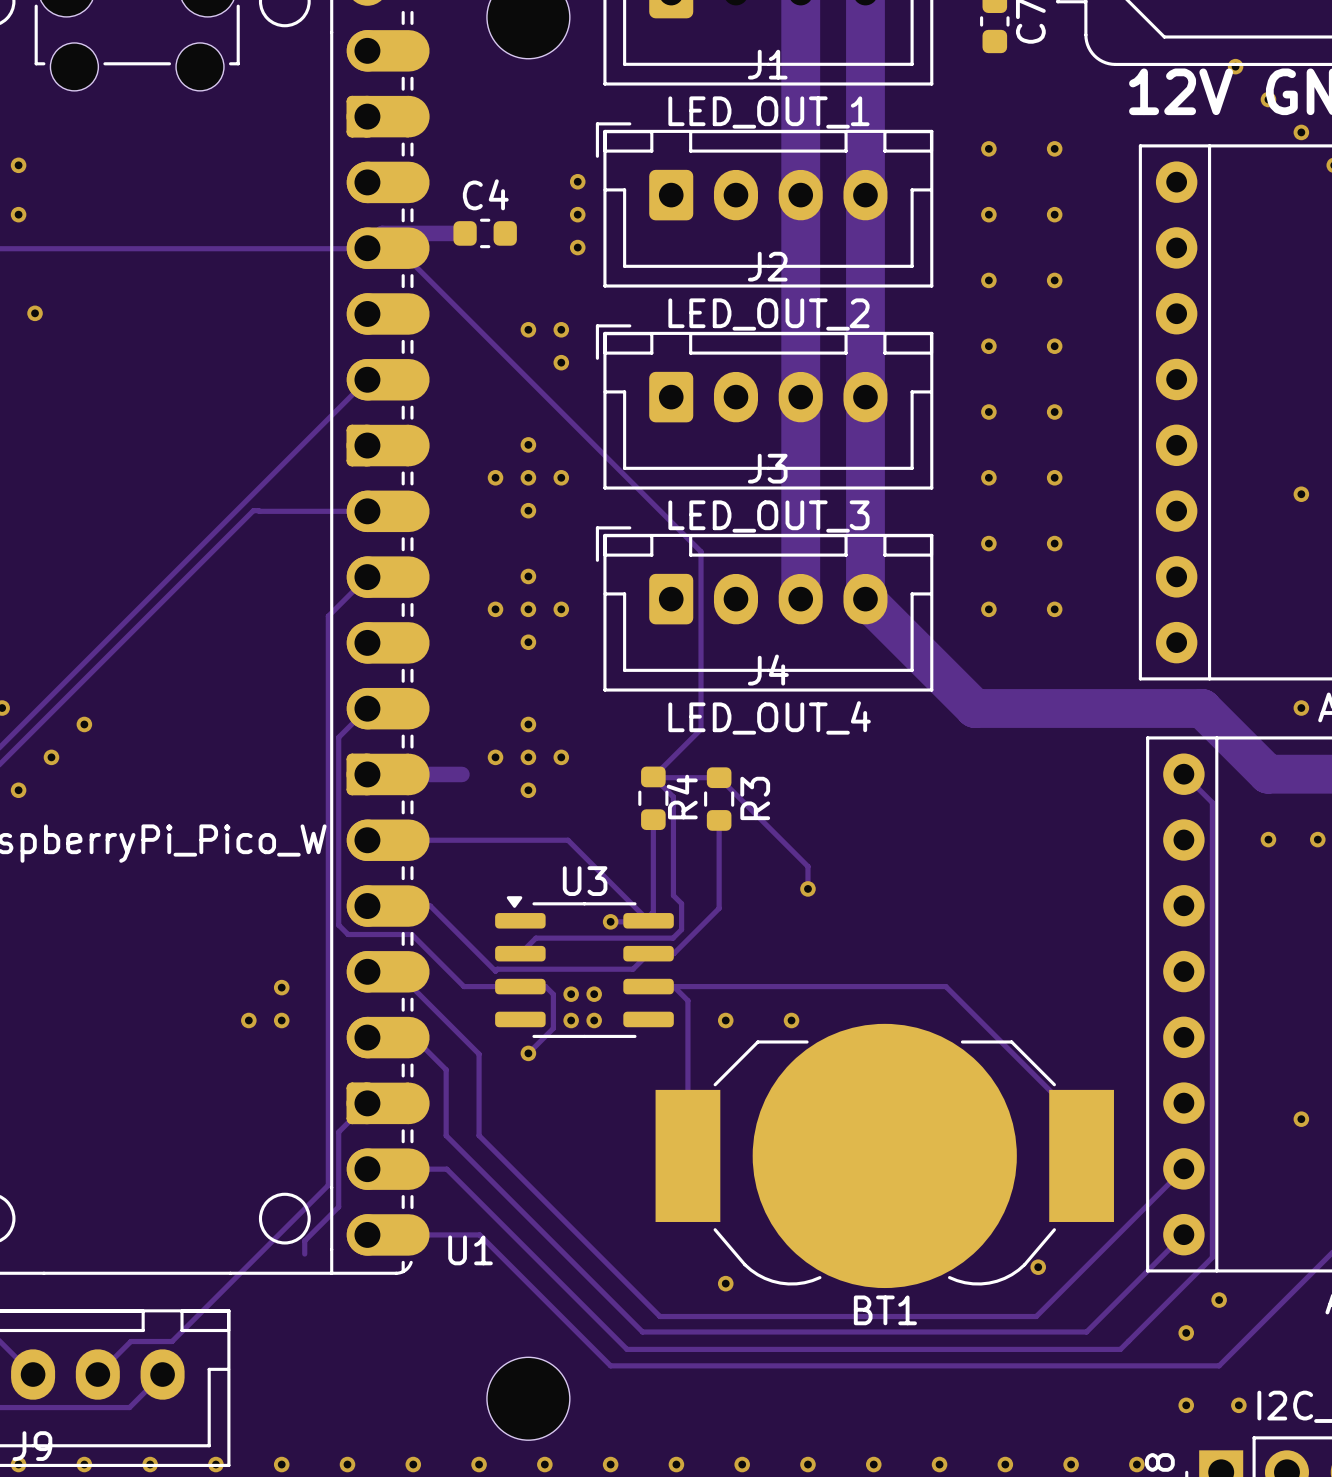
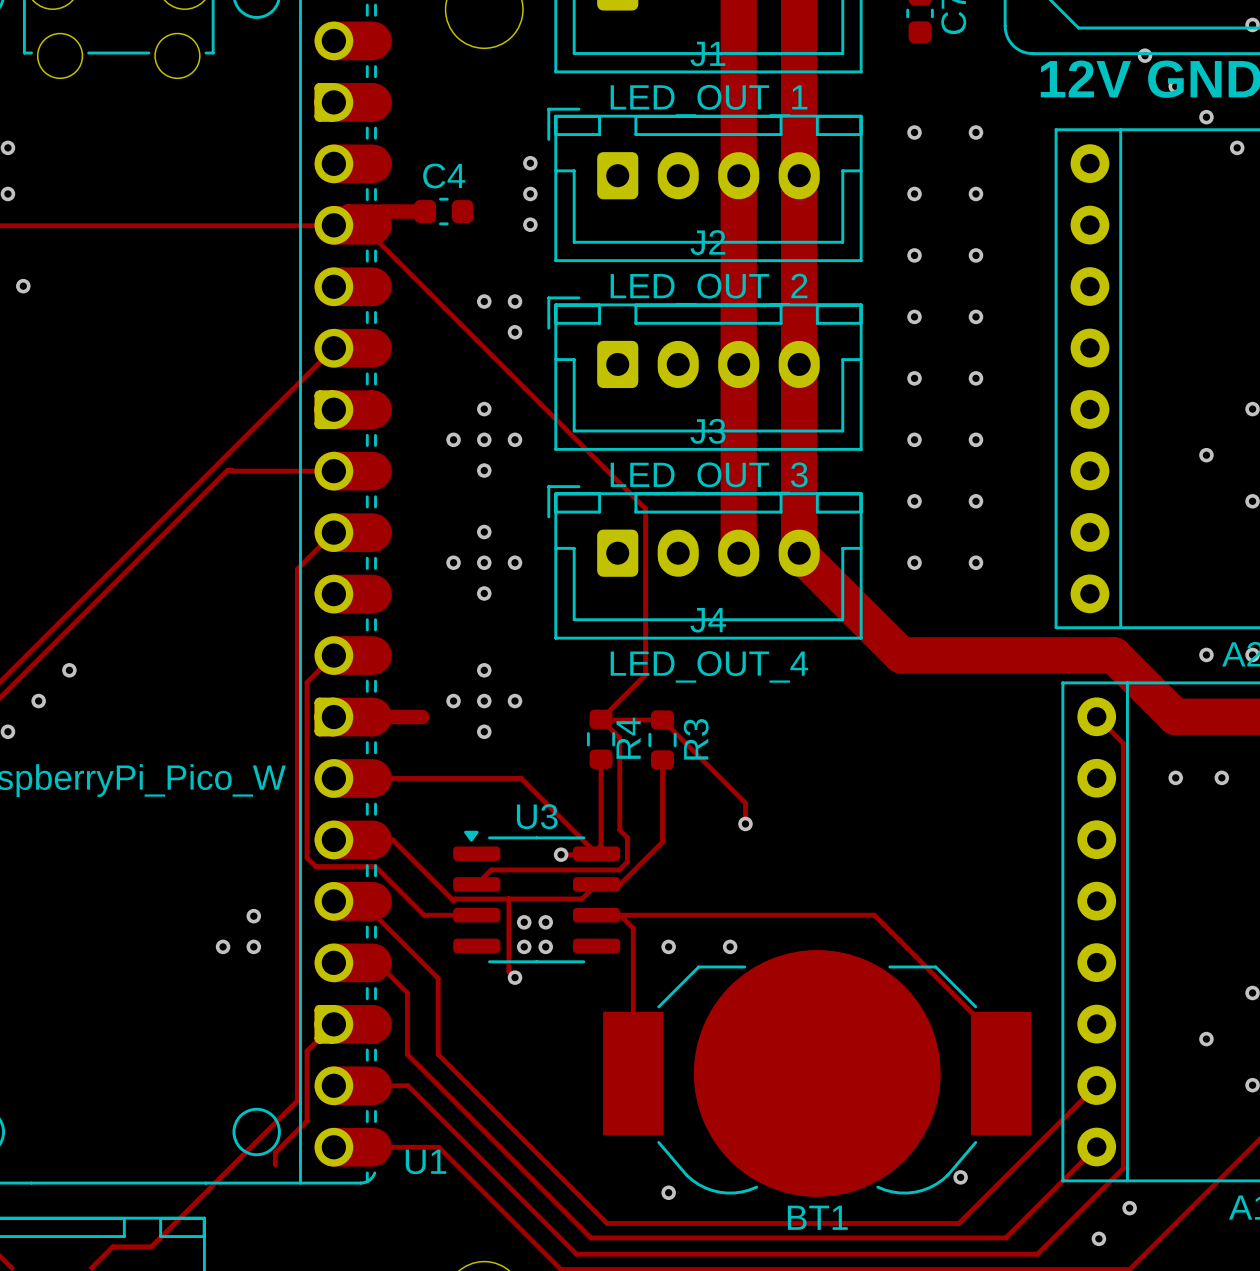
track: none -> (508, 898) (508, 971) (515, 977)
track: (520, 986) (545, 986) (553, 994) (553, 1028) (528, 1053) -> none
via position: (528, 1053) -> (515, 977)

